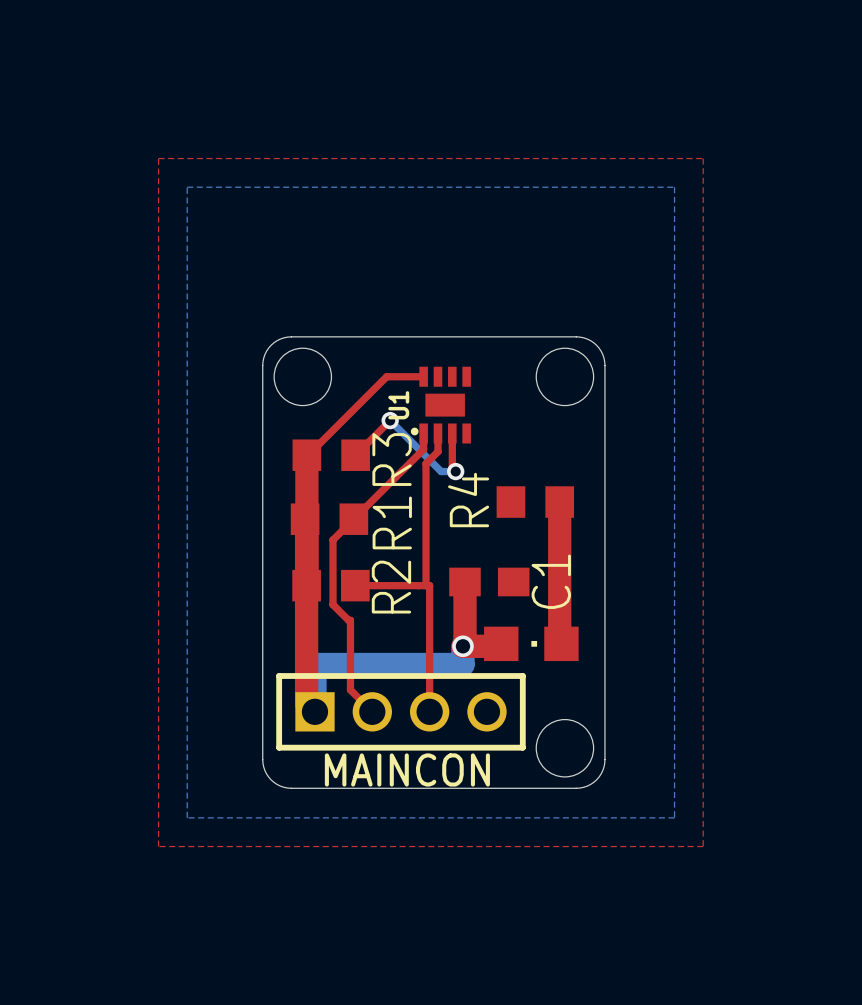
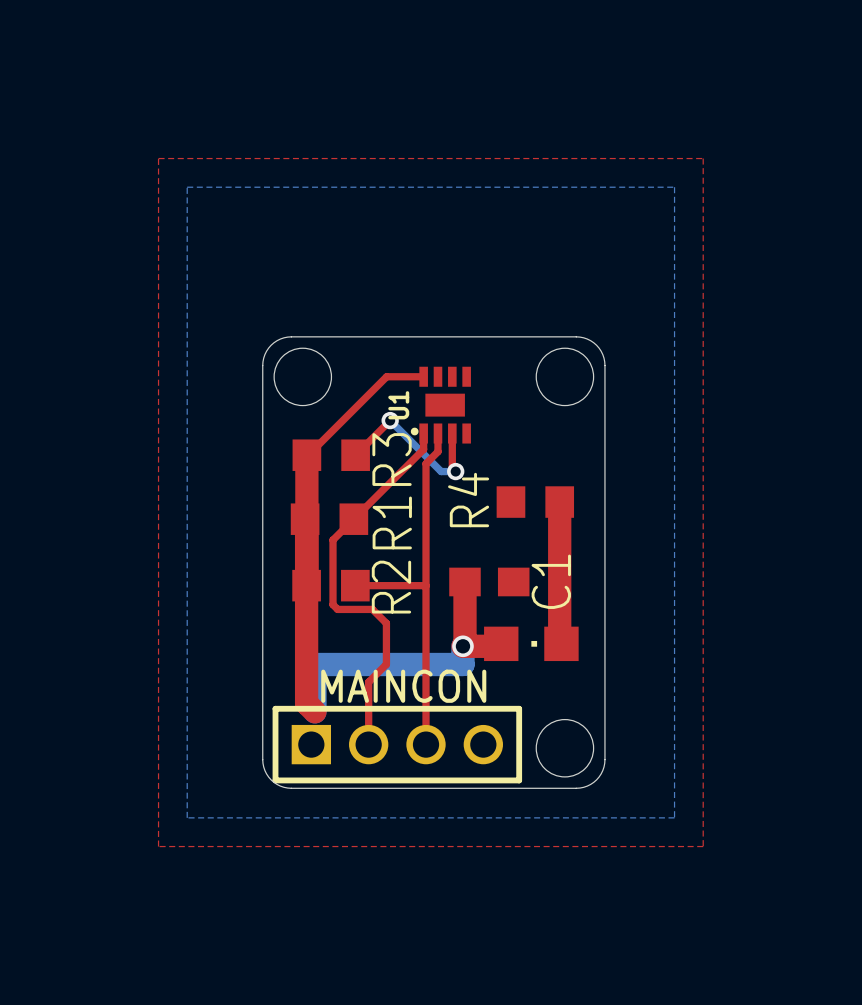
top track: (426, 585) (429, 585) (429, 711) -> (426, 585) (426, 744)
top track: (337, 609) (350, 620) (350, 689) (372, 711) -> (337, 609) (372, 609) (386, 623) (386, 664) (368, 682) (368, 744)
MAINCON position: (400, 711) -> (397, 744)
MAINCON name position: MAINCON (407, 769) -> MAINCON (403, 686)

